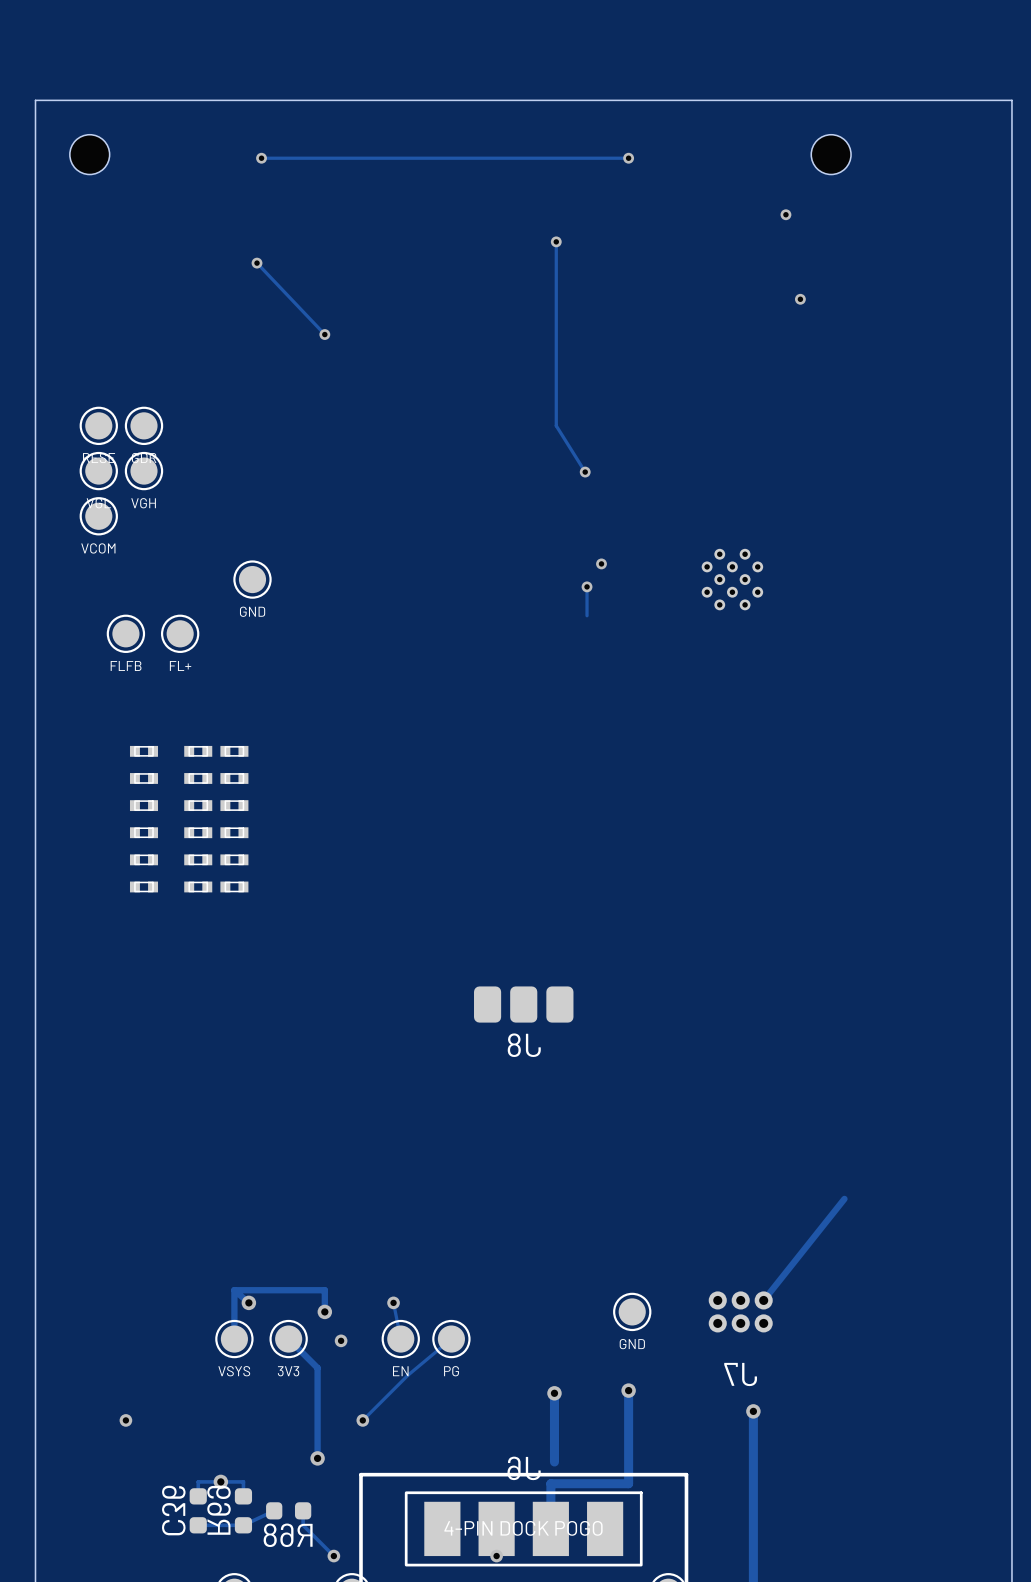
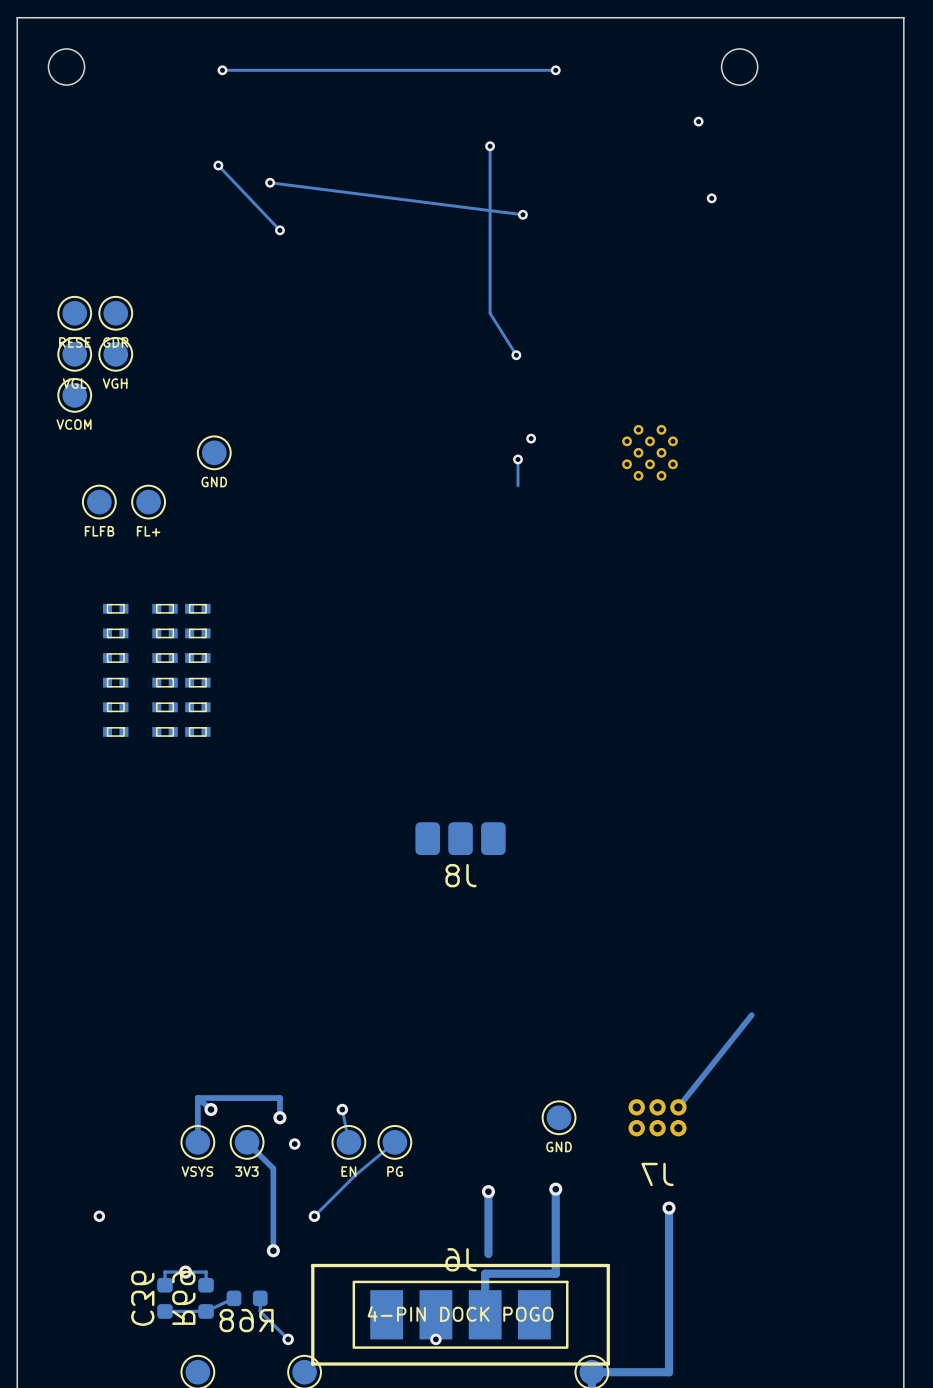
track: none -> (270, 182) (522, 214)
via: none -> (270, 182)
via: none -> (522, 214)

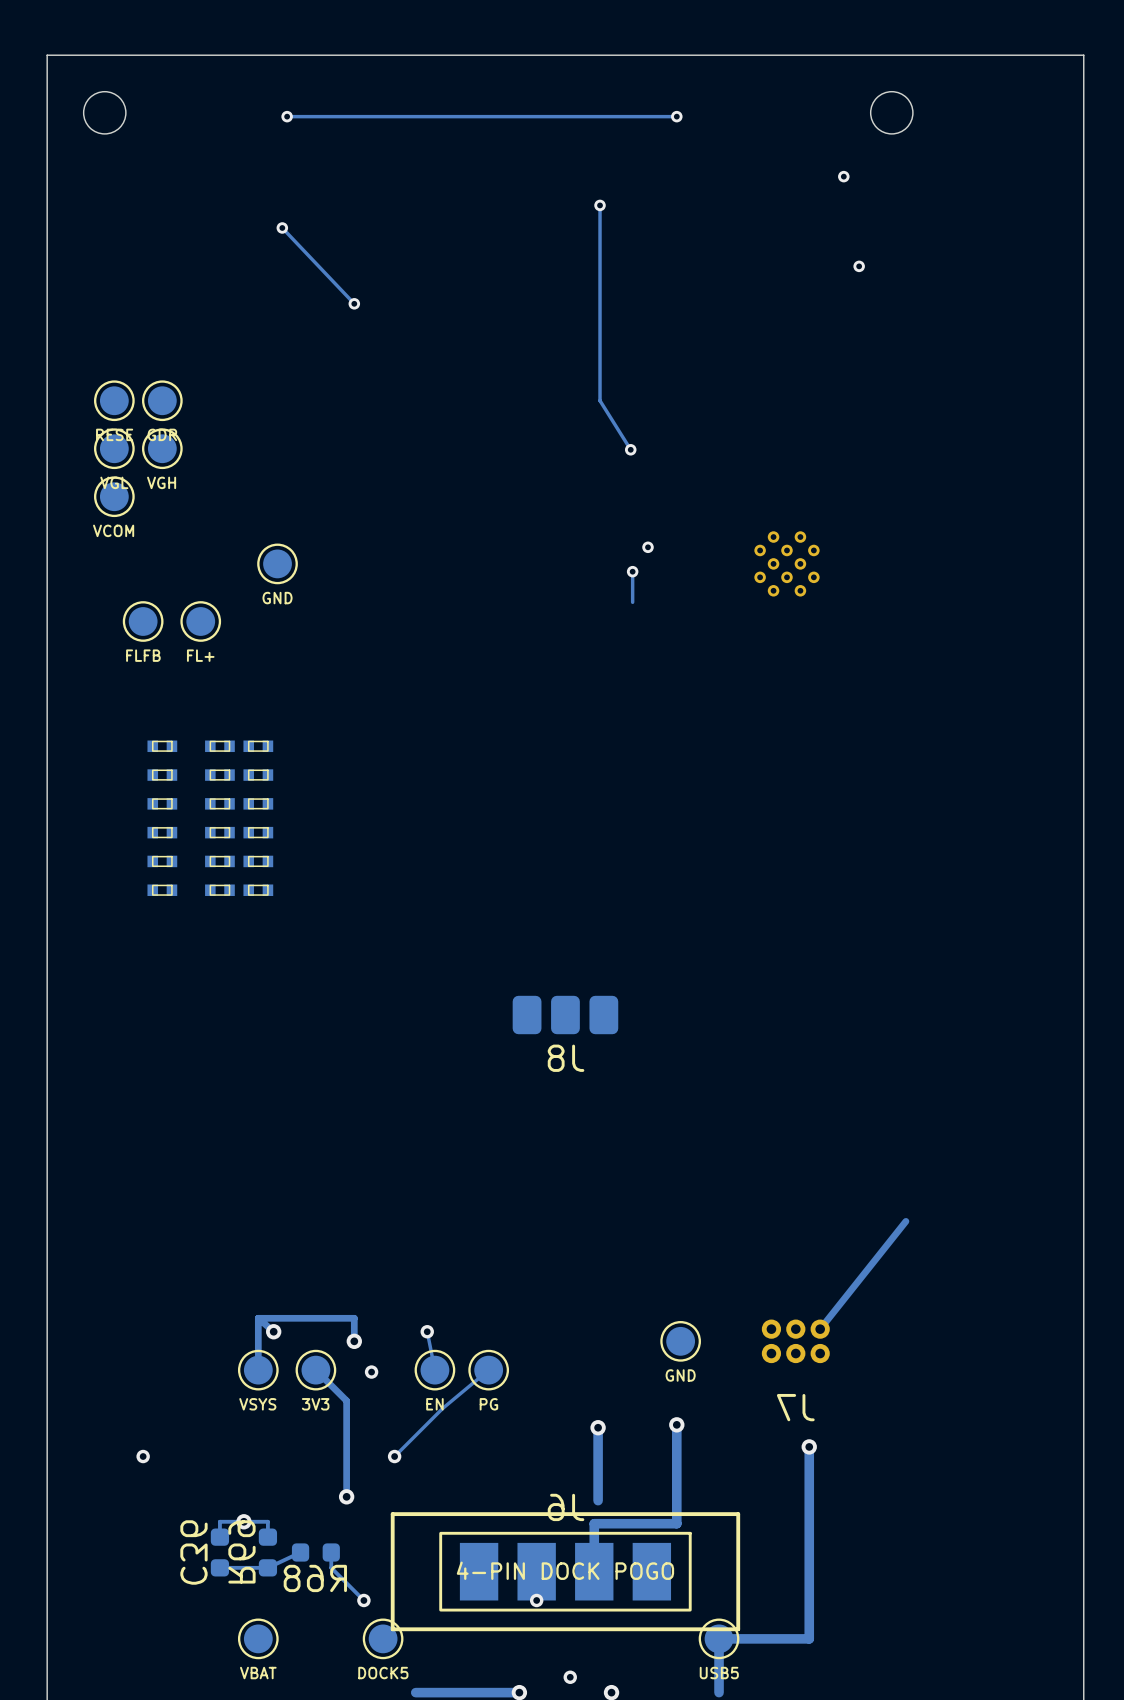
track: (270, 182) (522, 214) -> none
via: (270, 182) -> none
via: (522, 214) -> none

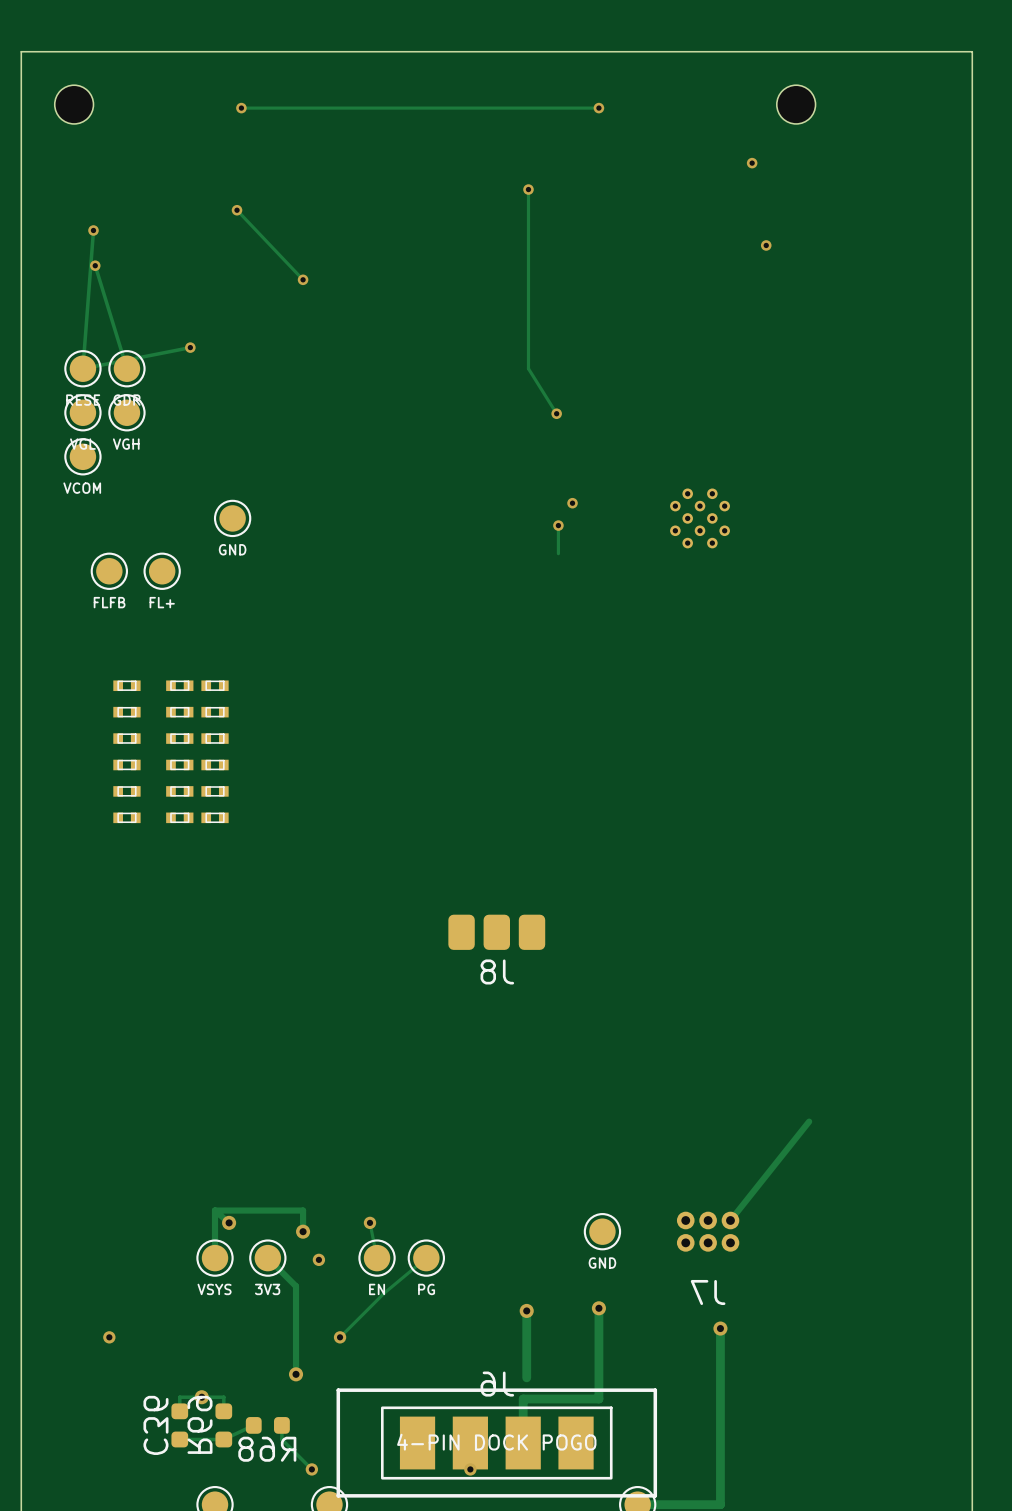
track: none -> (93, 230) (82, 368) (190, 347)
via: none -> (93, 230)
track: none -> (95, 265) (126, 368)
via: none -> (95, 265)
via: none -> (190, 347)

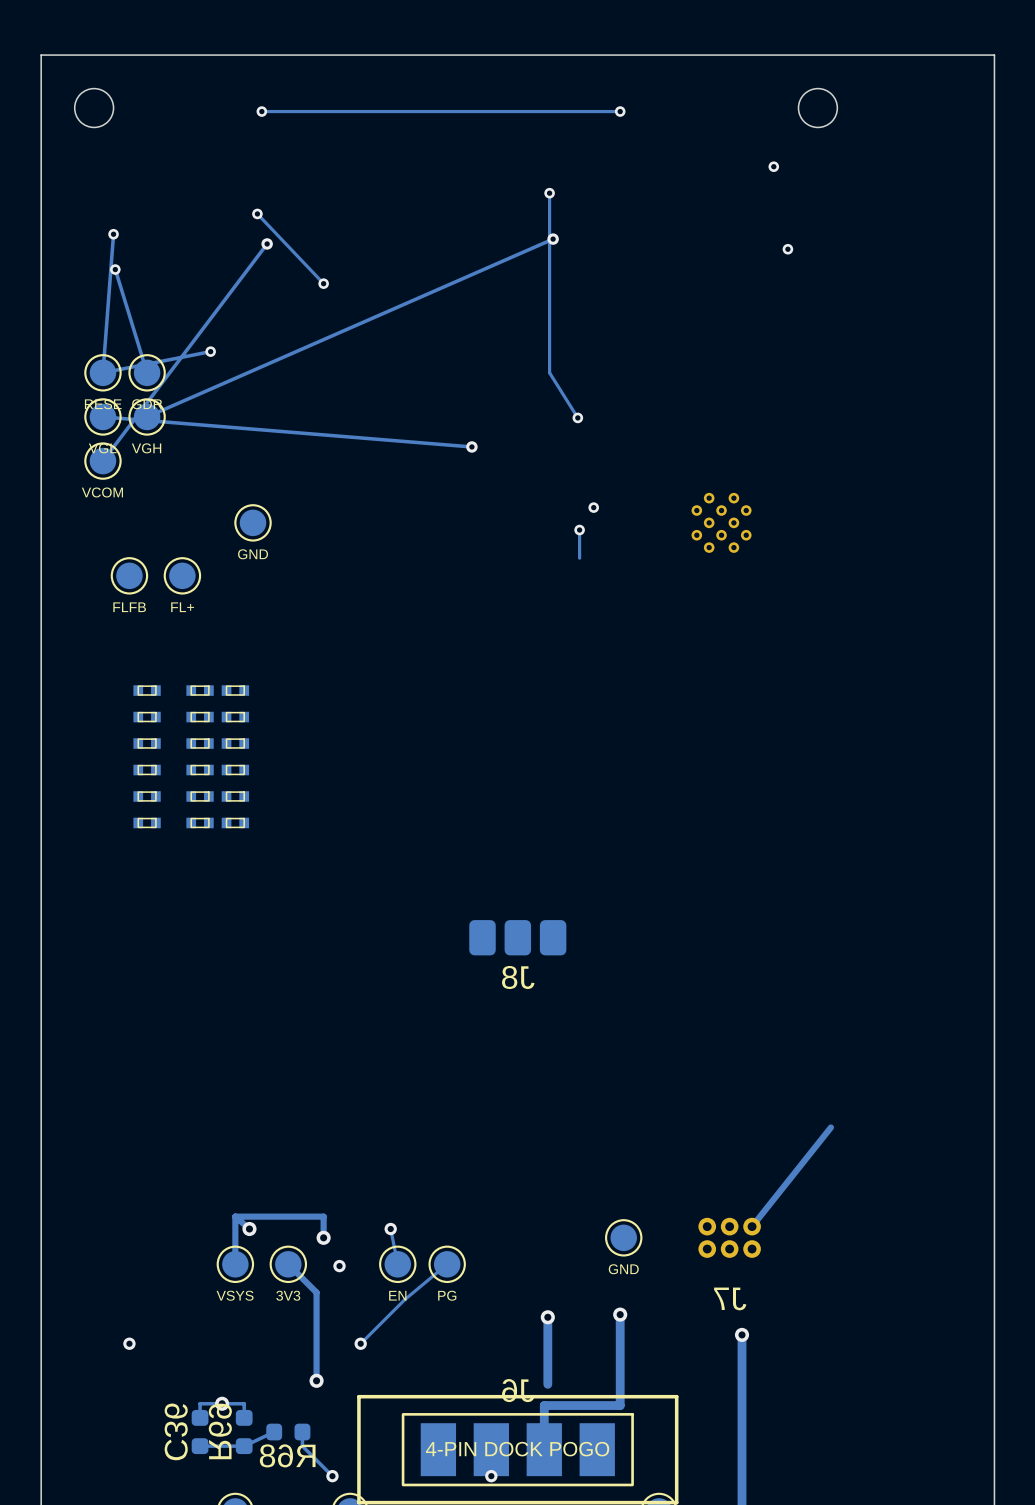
track: none -> (553, 239) (147, 416)
via: none -> (553, 239)
track: none -> (267, 243) (102, 461)
via: none -> (267, 243)
track: none -> (102, 416) (471, 446)
via: none -> (471, 446)

